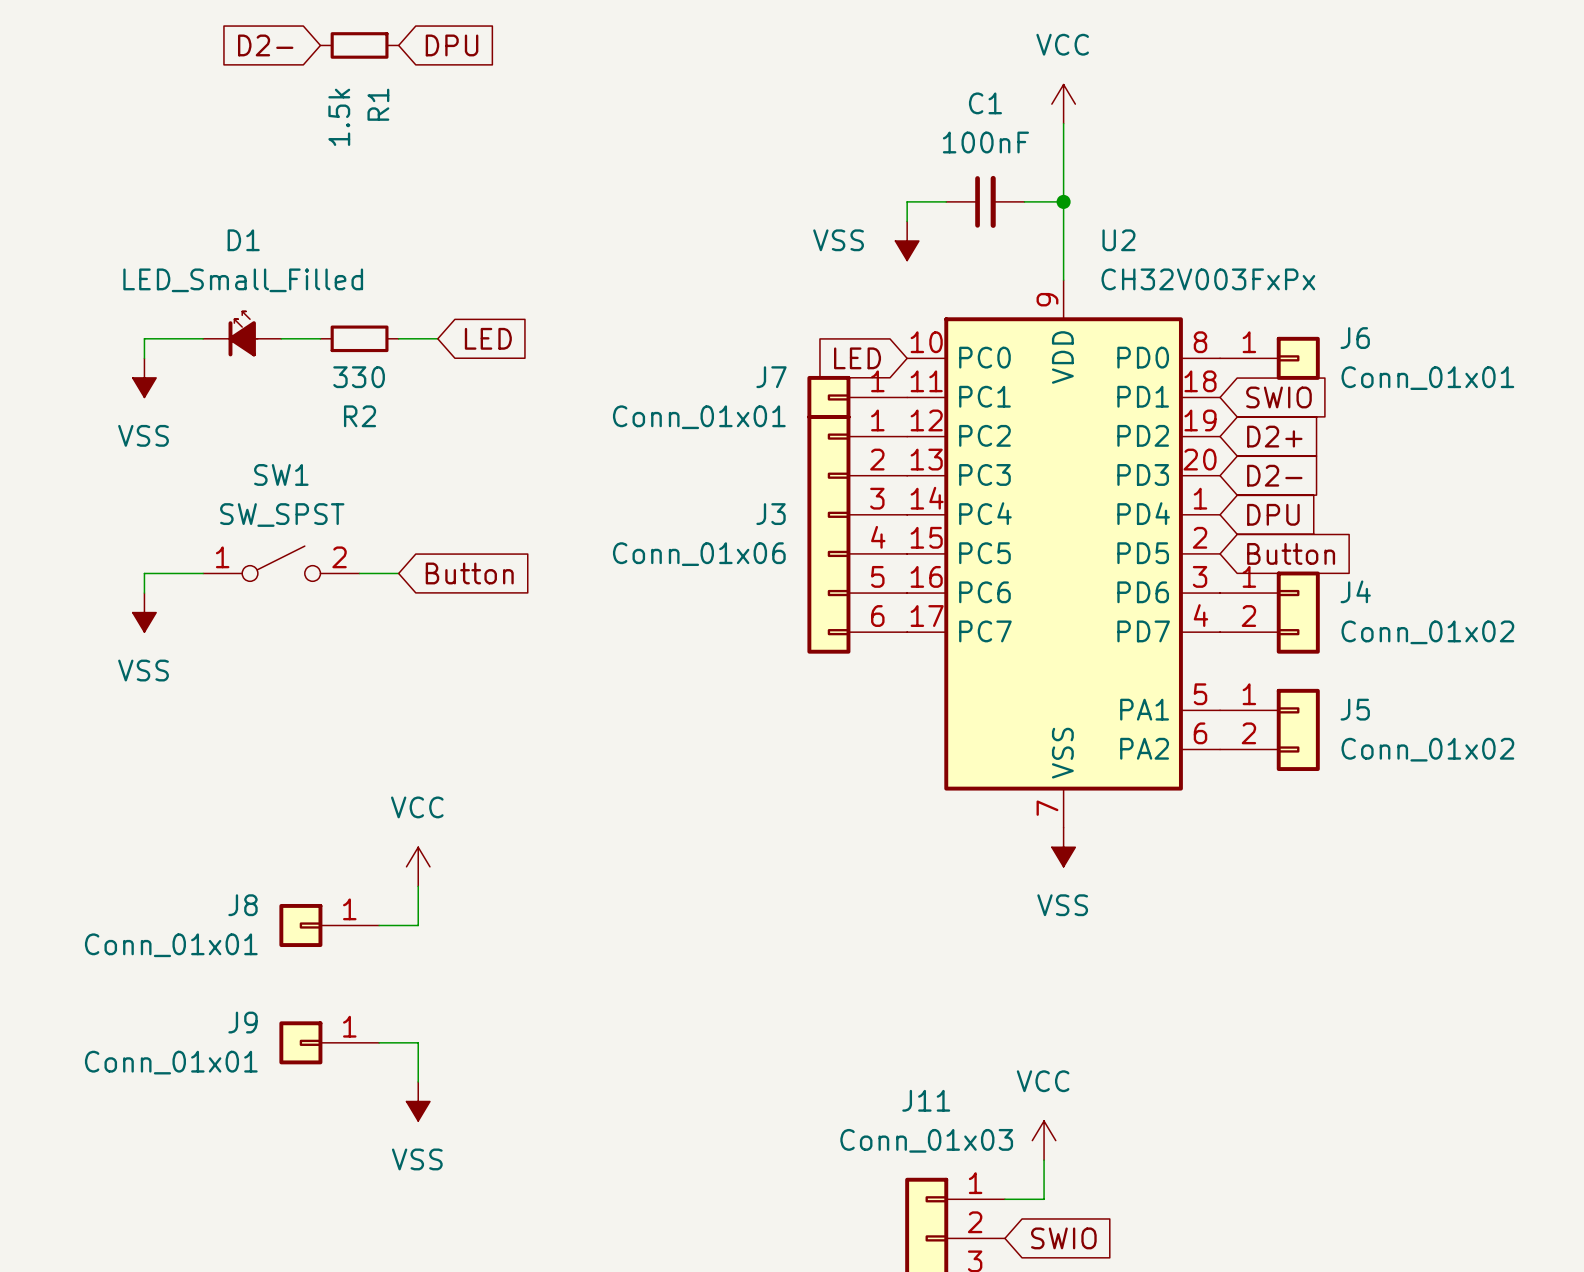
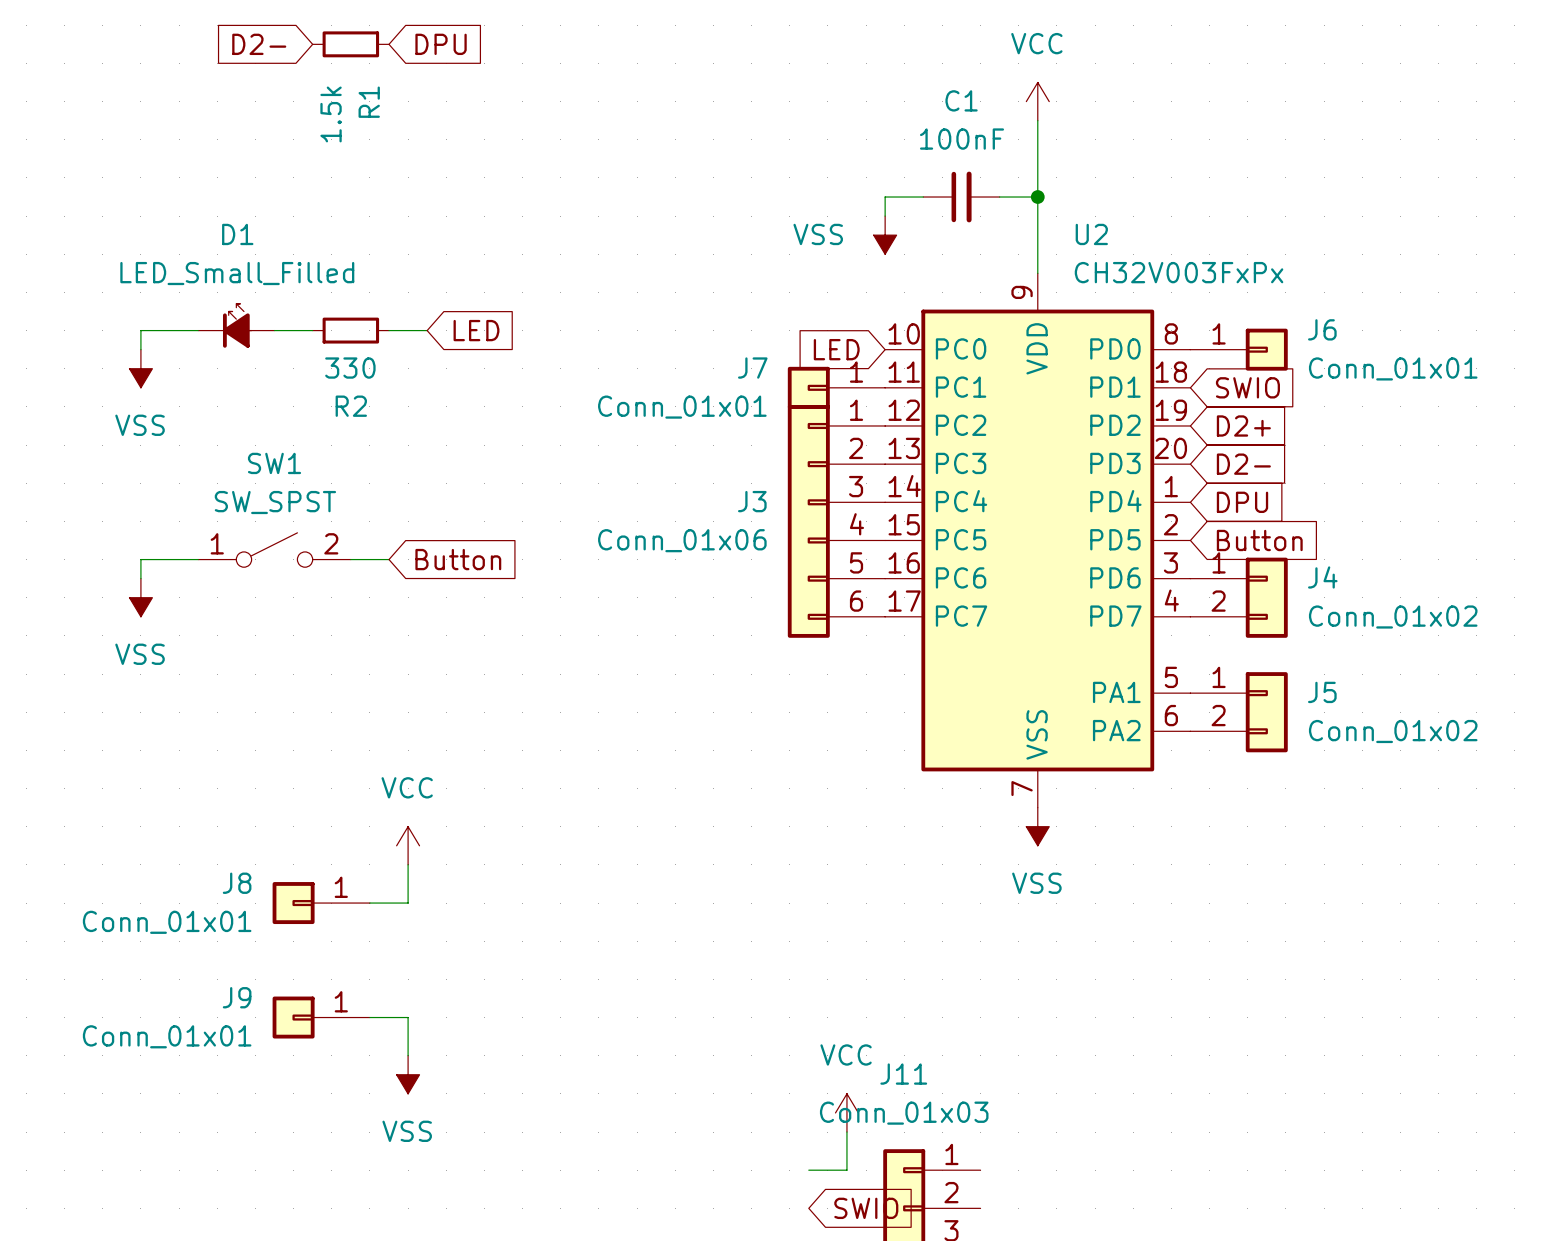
power symbol position: VCC (1044, 1140) -> VCC (846, 1112)
wire: (1044, 1160) (1044, 1199) (1004, 1199) -> (846, 1132) (846, 1170) (808, 1170)
global label position: SWIO (1063, 1238) -> SWIO (866, 1208)

